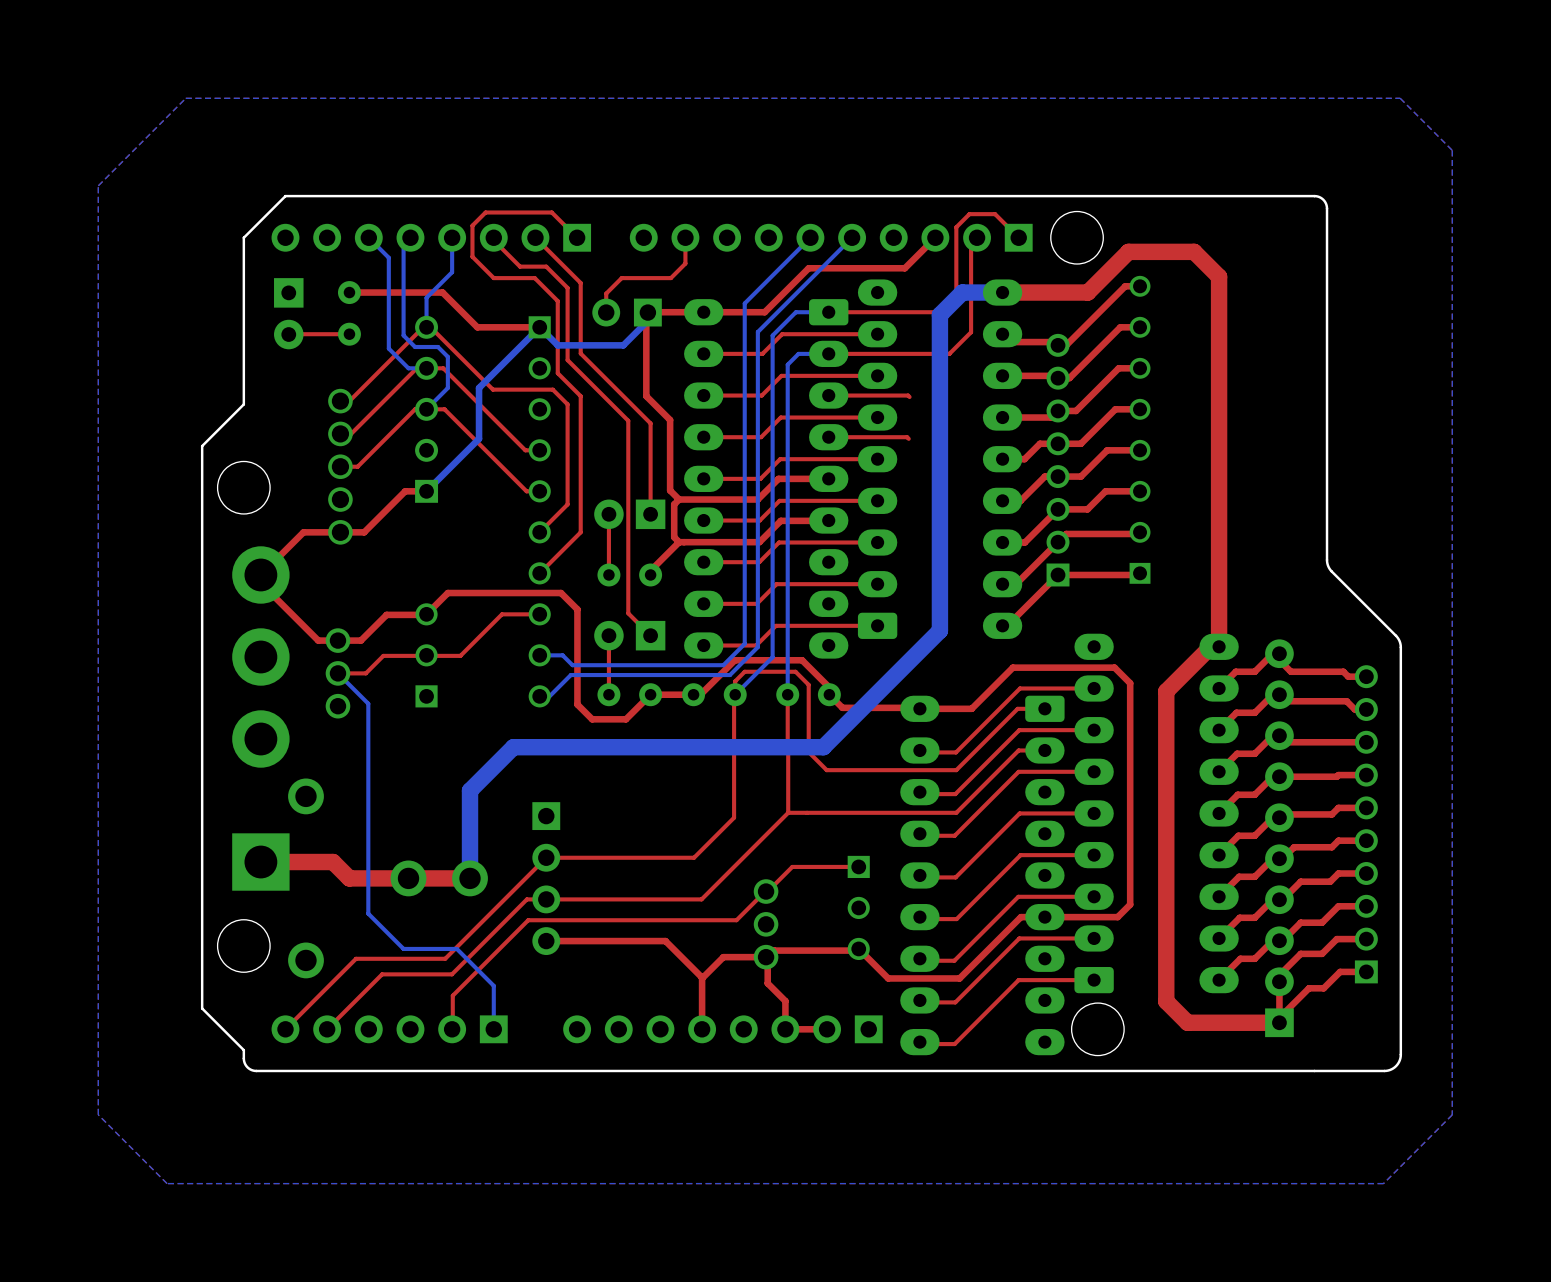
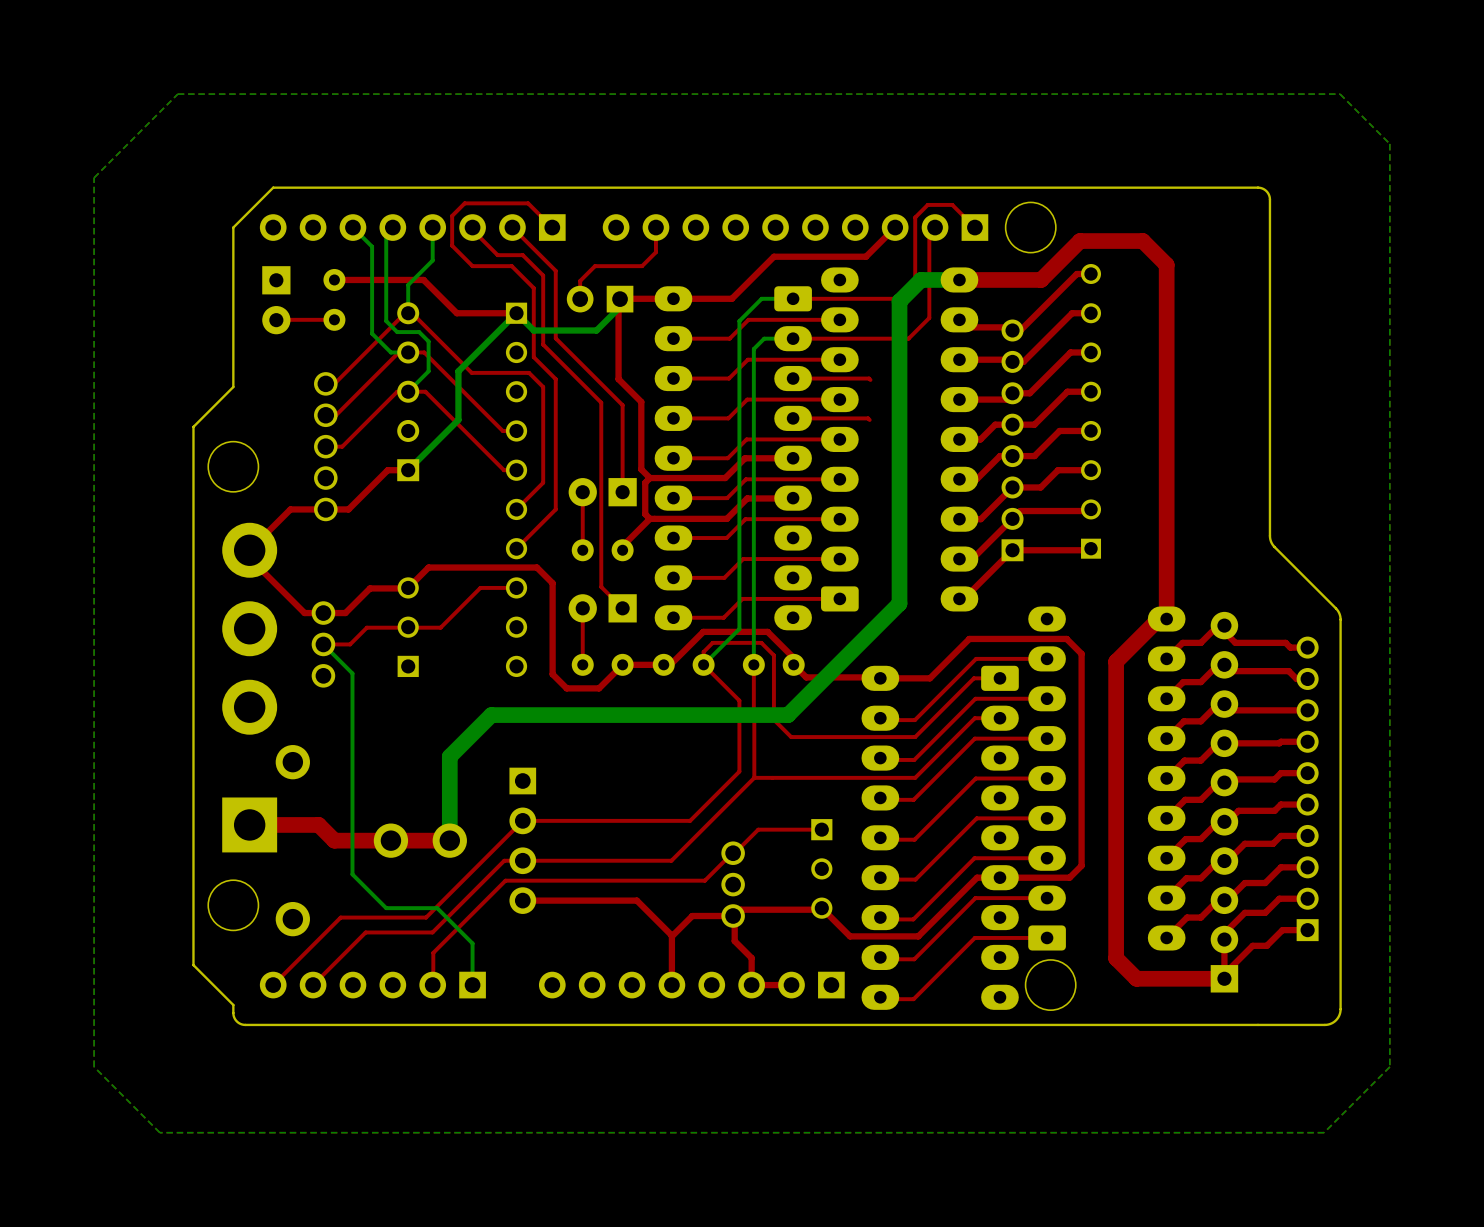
bottom track: (810, 237) (744, 303) (744, 643) (723, 665) (572, 665) (562, 655) (539, 655) -> none
bottom track: (852, 237) (757, 331) (757, 647) (729, 675) (570, 675) (546, 699) (536, 699) -> none
top track: (735, 694) (734, 817) (694, 857) -> (703, 664) (739, 700) (739, 771) (690, 820) (664, 820)

